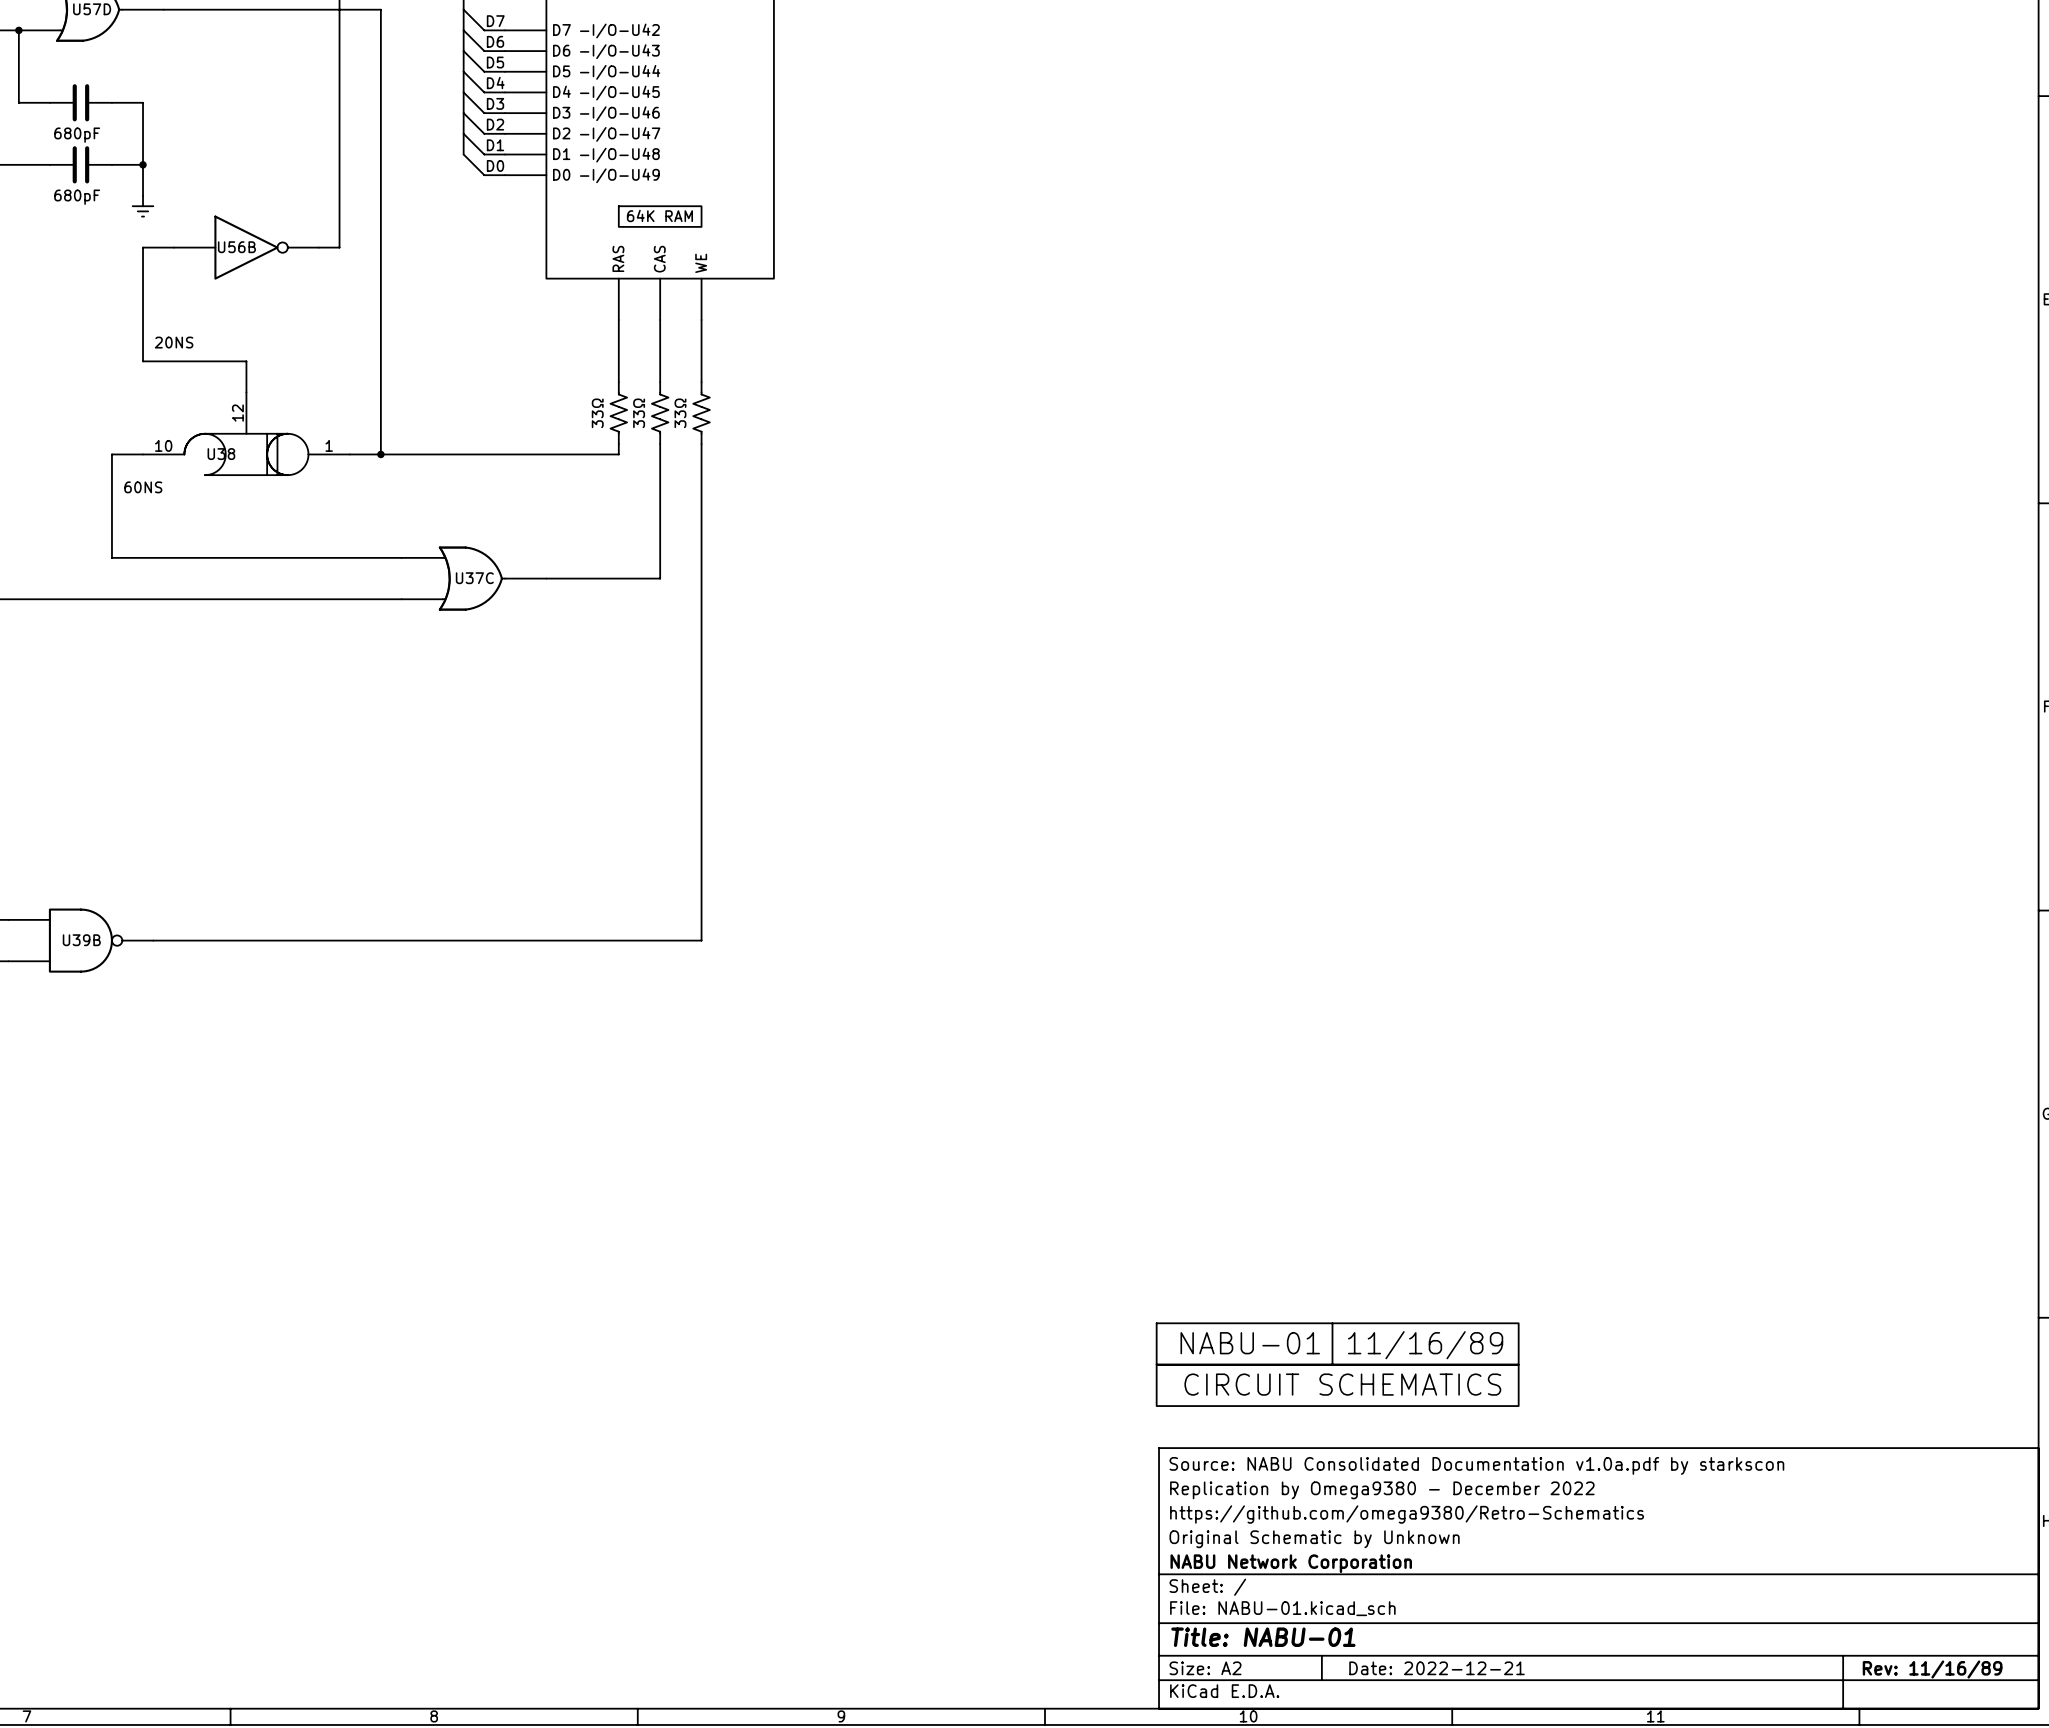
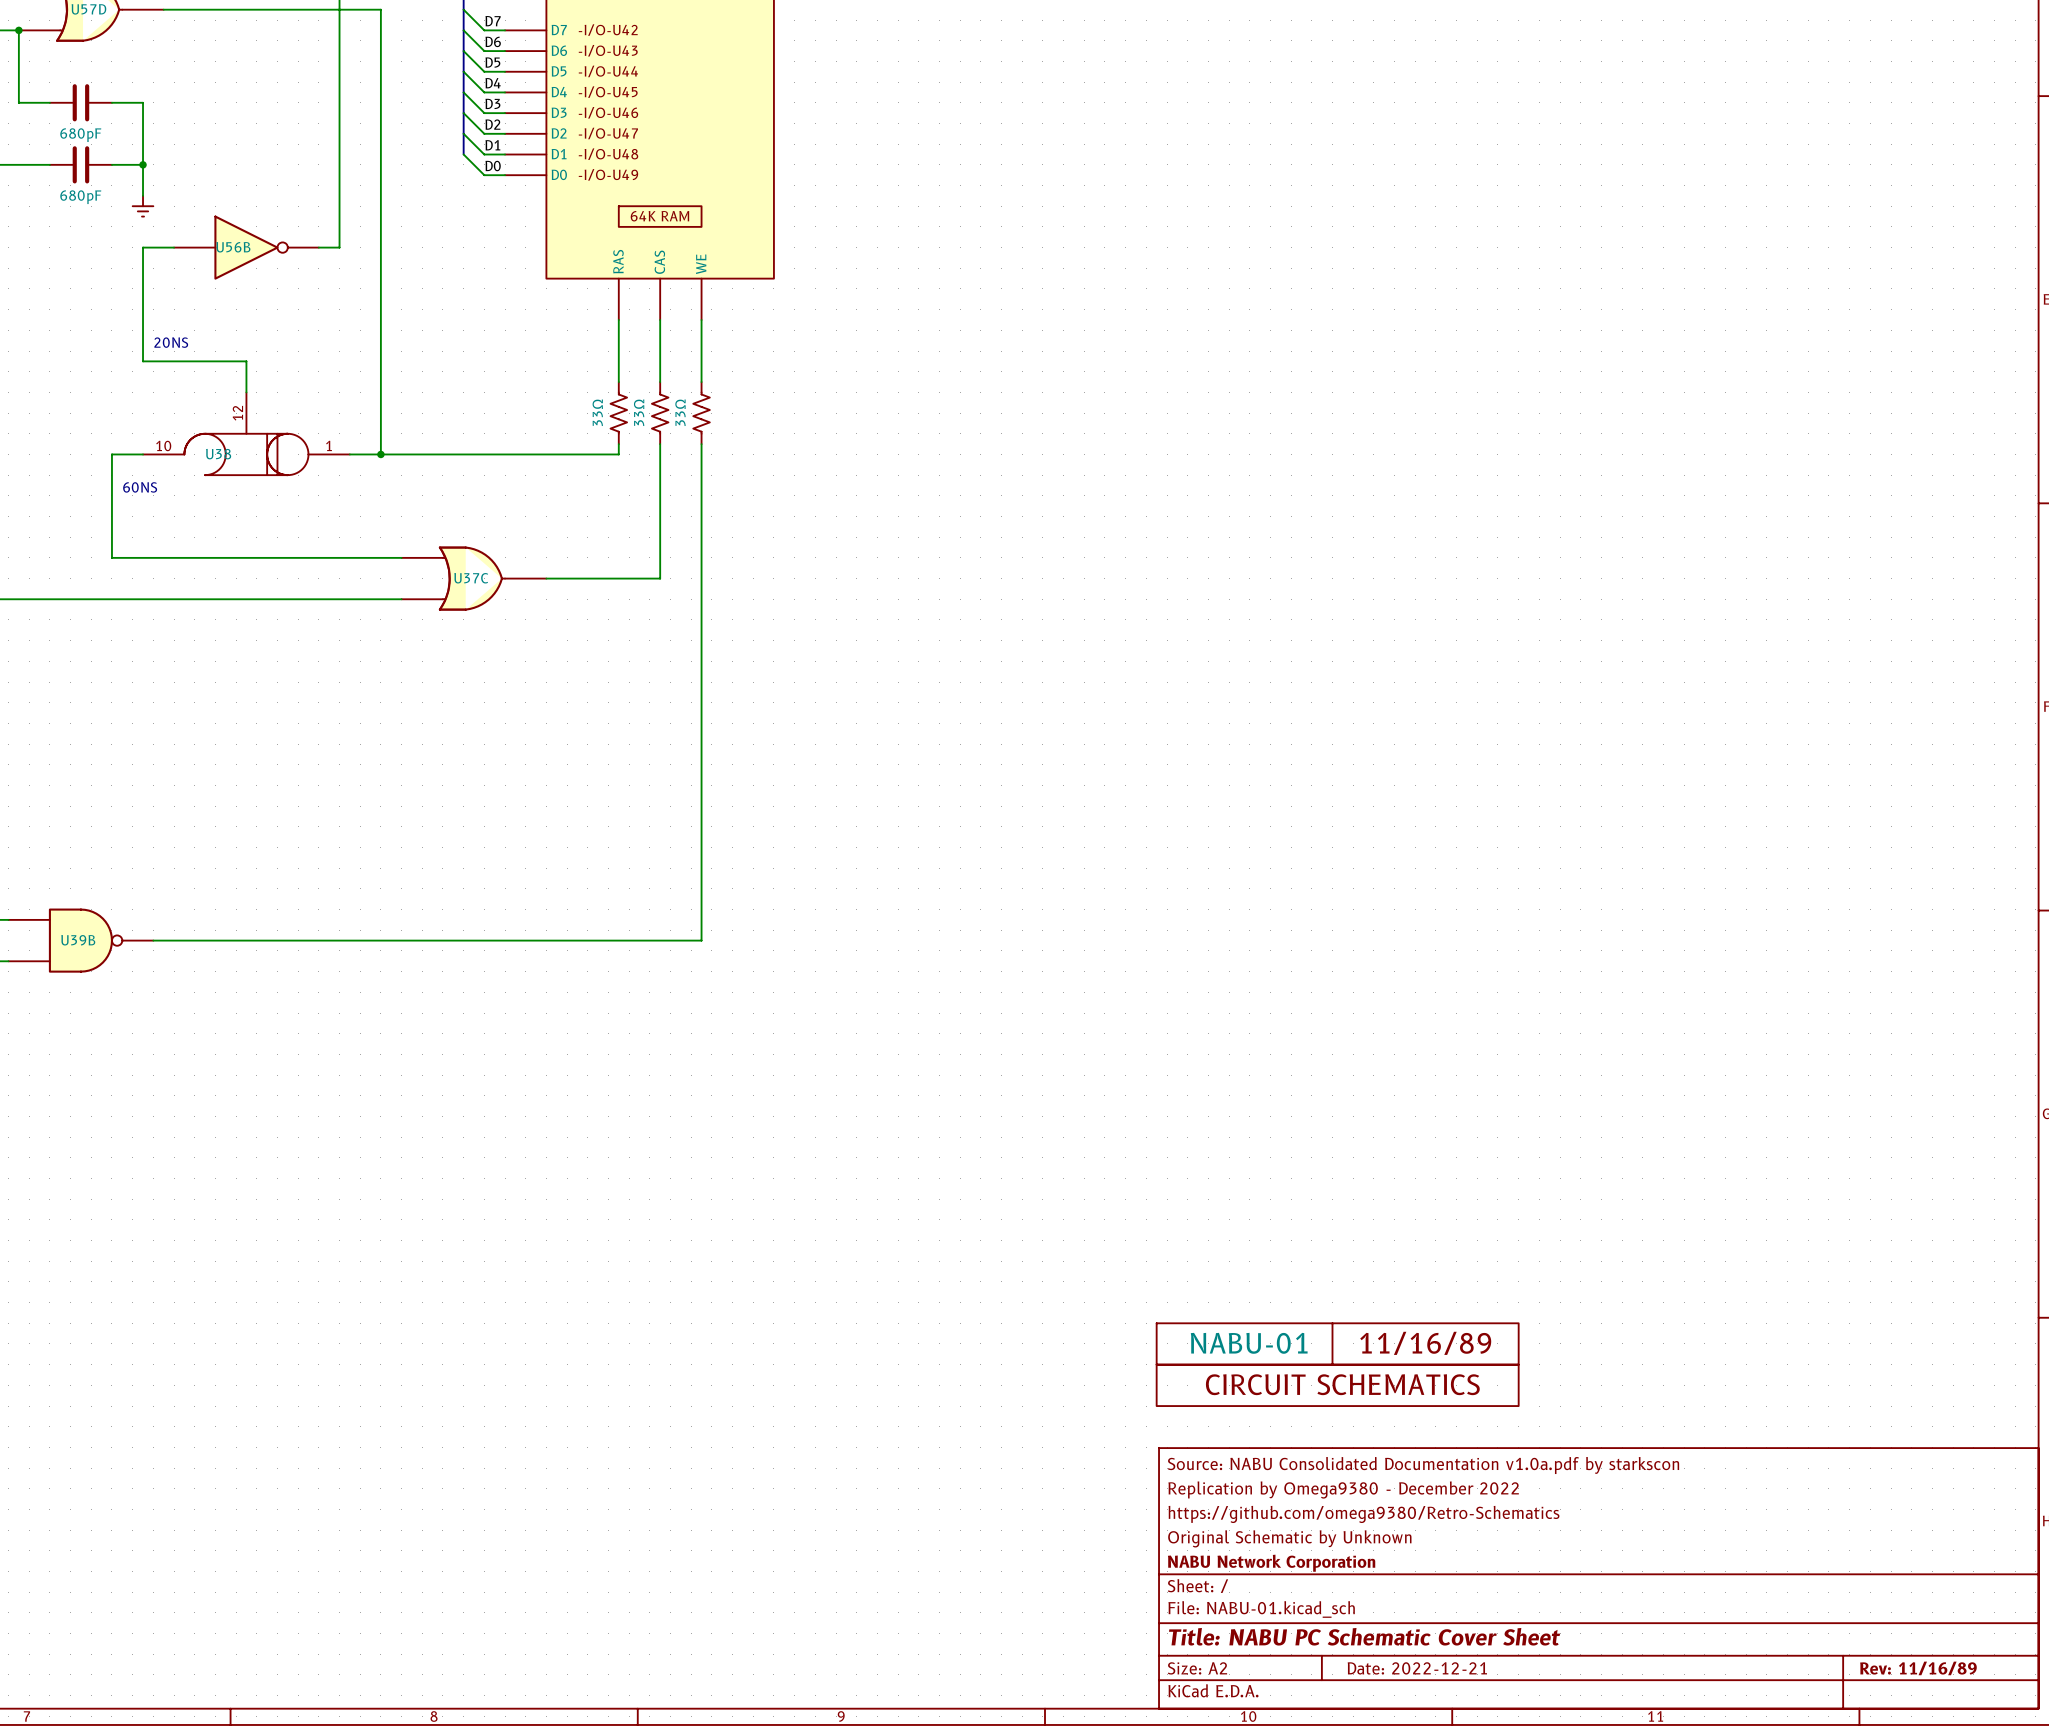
title block: Title: NABU-01 (1263, 1637) -> Title: NABU PC Schematic Cover Sheet (1364, 1636)

